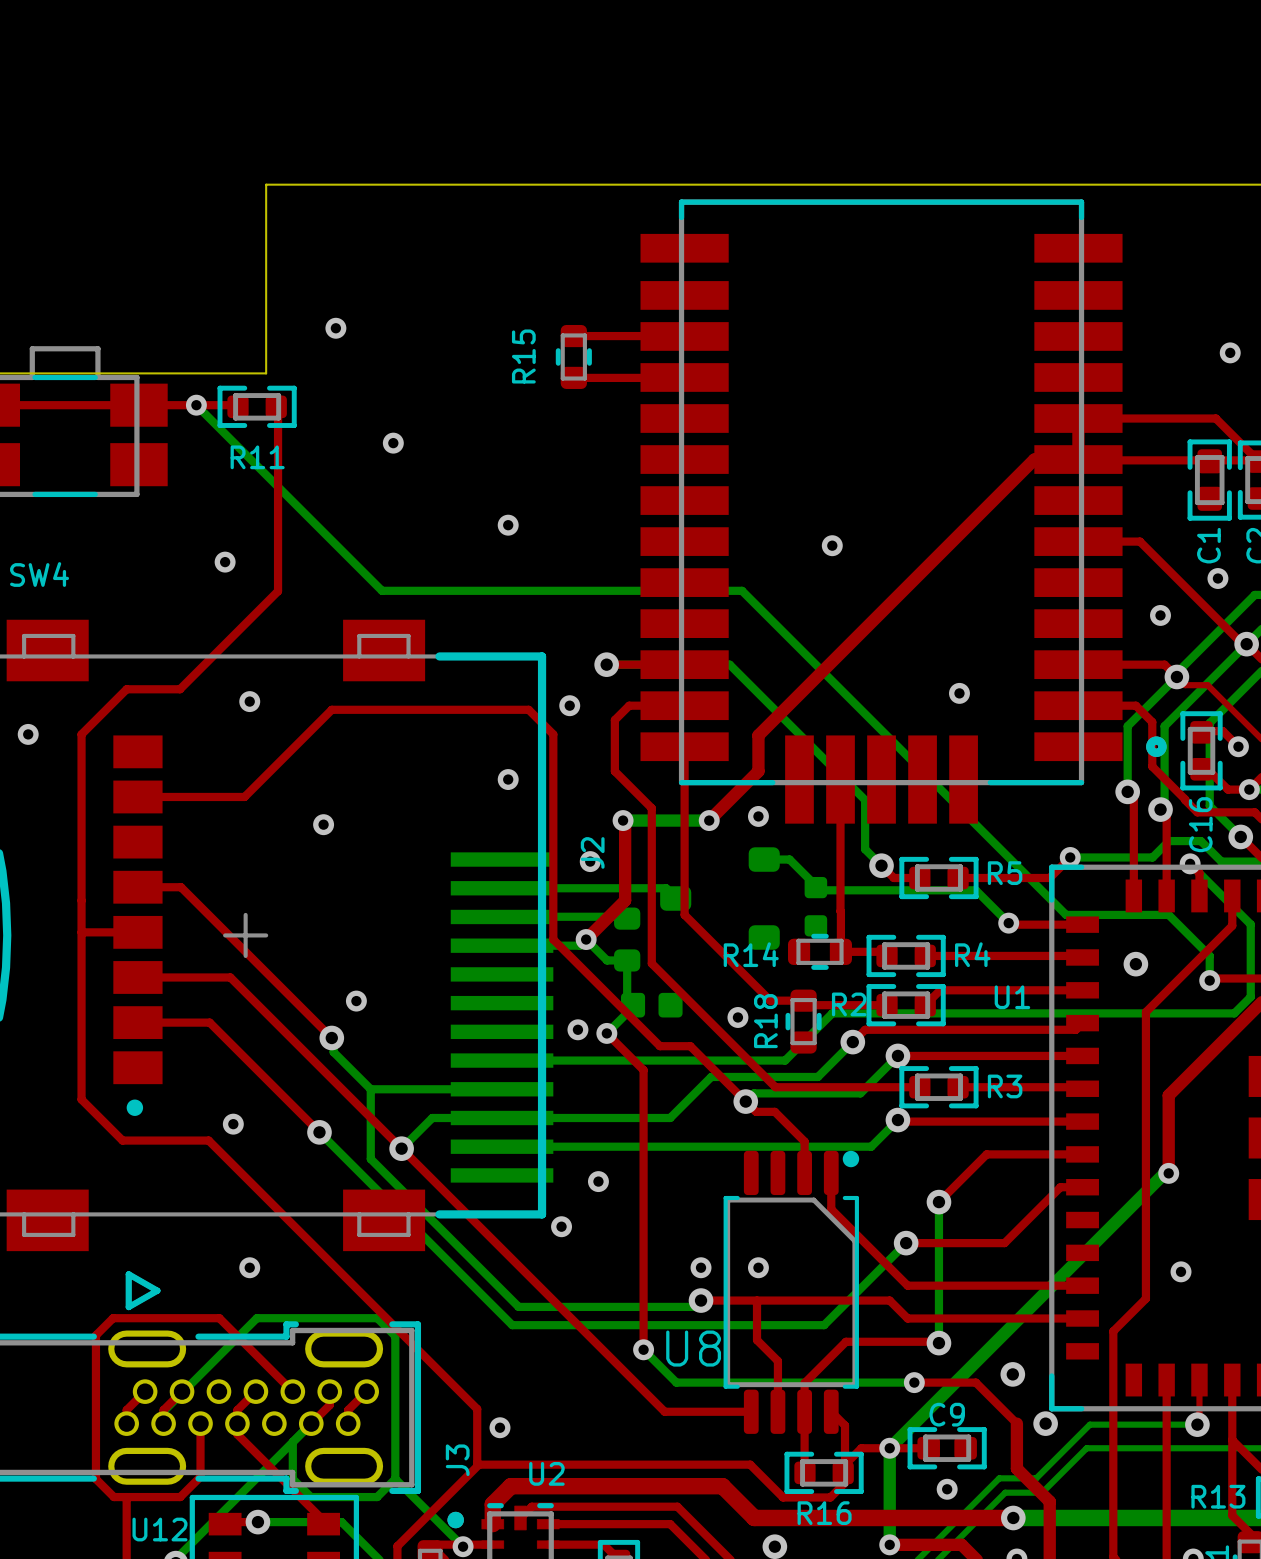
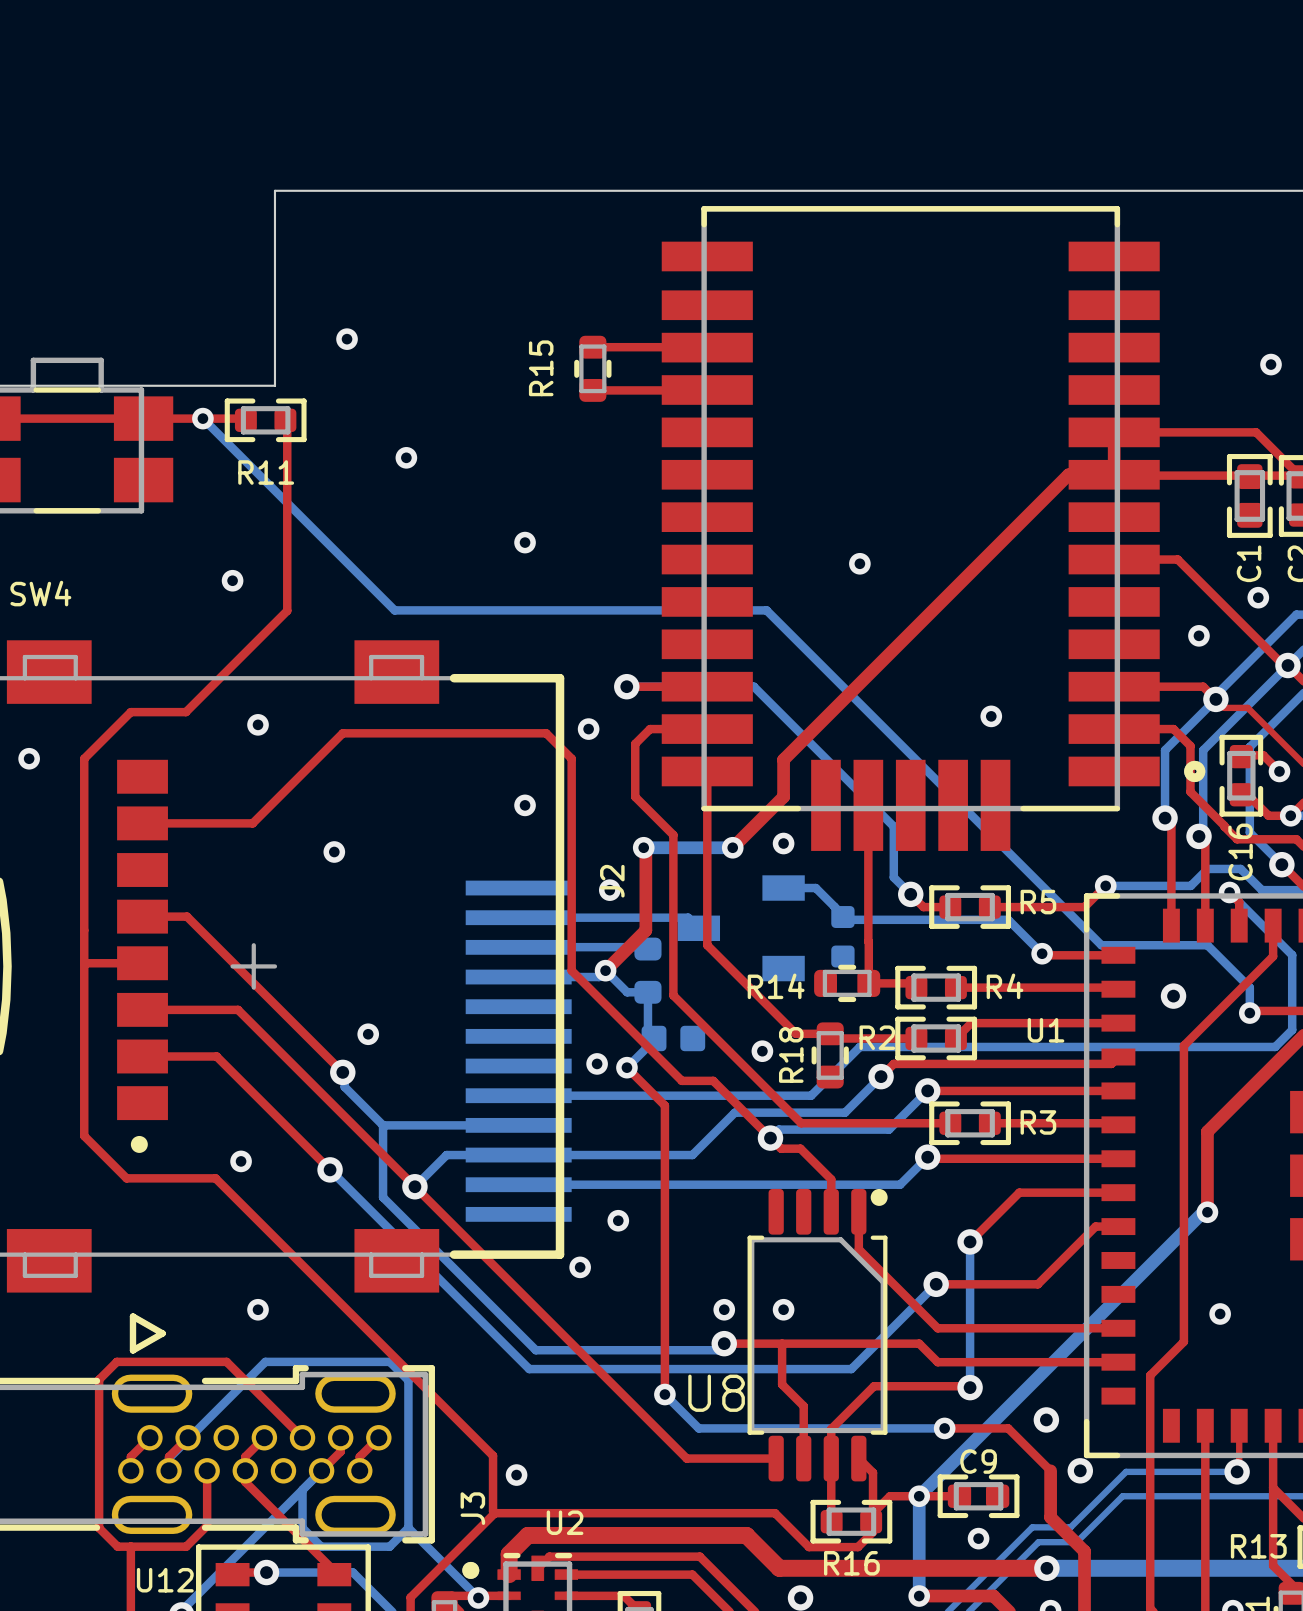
part footprint: [660, 847, 780, 950] -> [677, 875, 805, 982]

